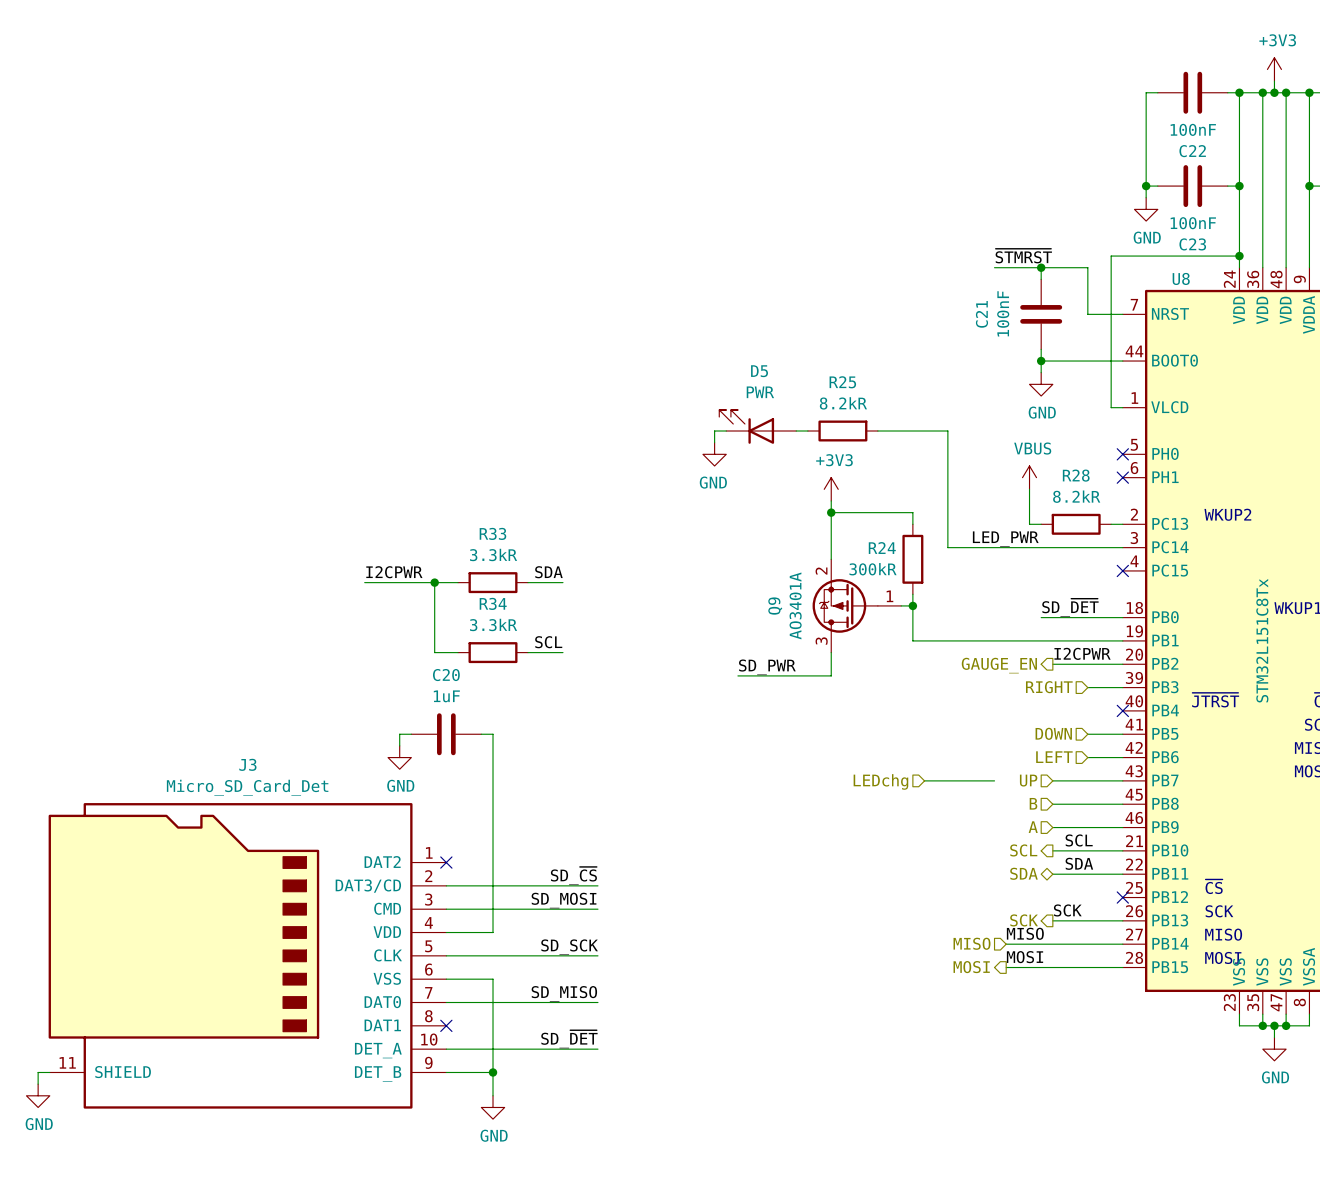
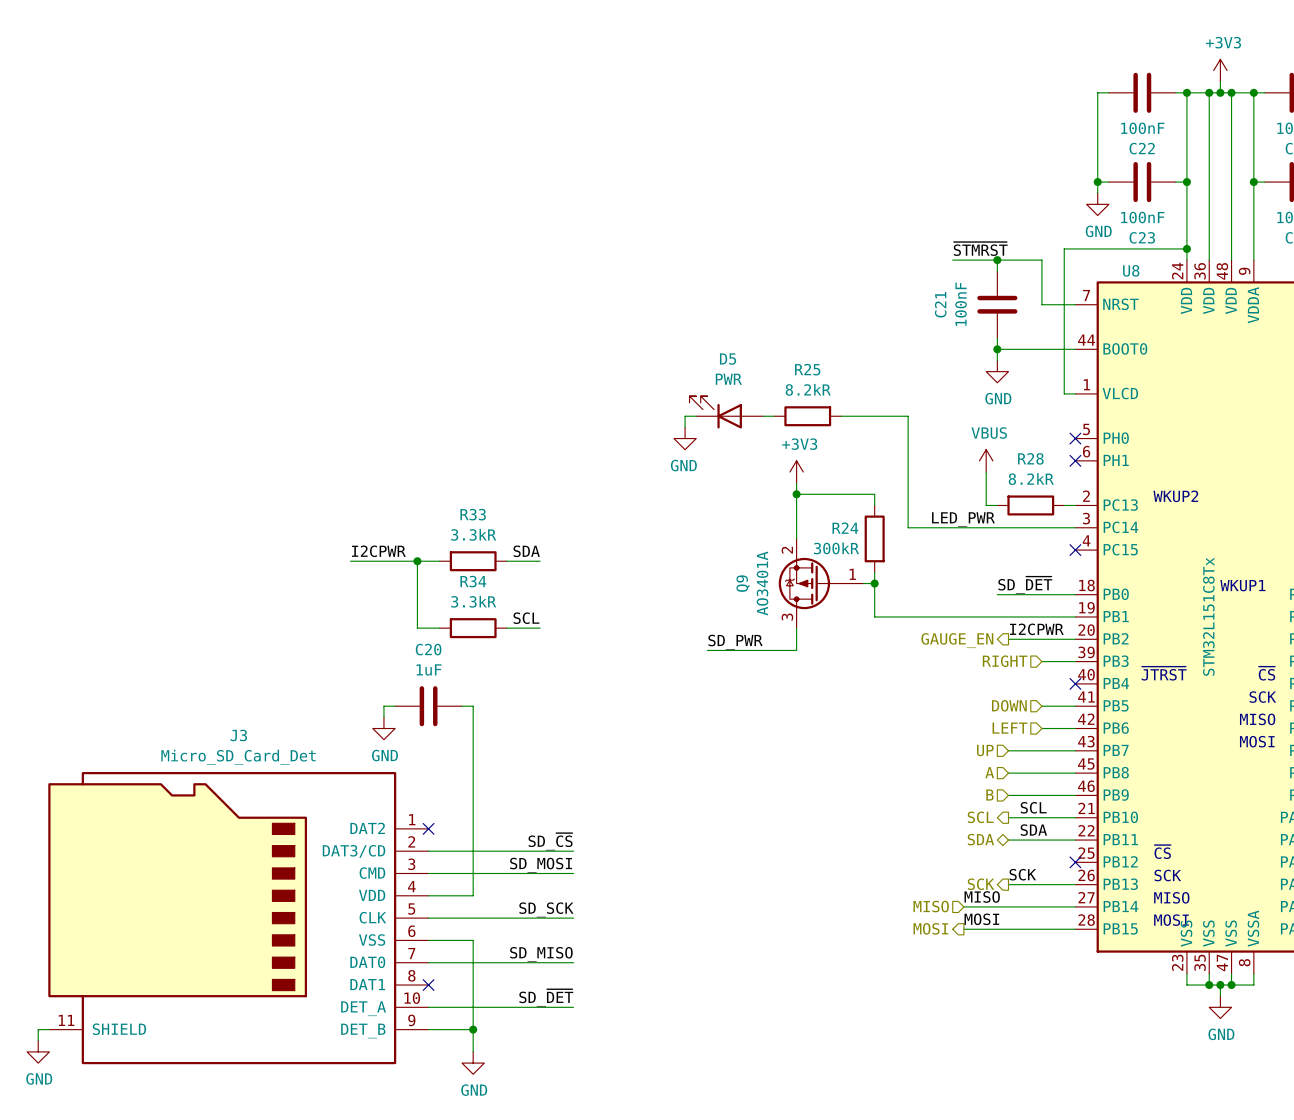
wire: (924, 780) (994, 780) -> none
hierarchical label: LEDchg (880, 781) -> none
hierarchical label: B (1033, 803) -> A (989, 772)
hierarchical label: A (1033, 827) -> B (989, 795)

